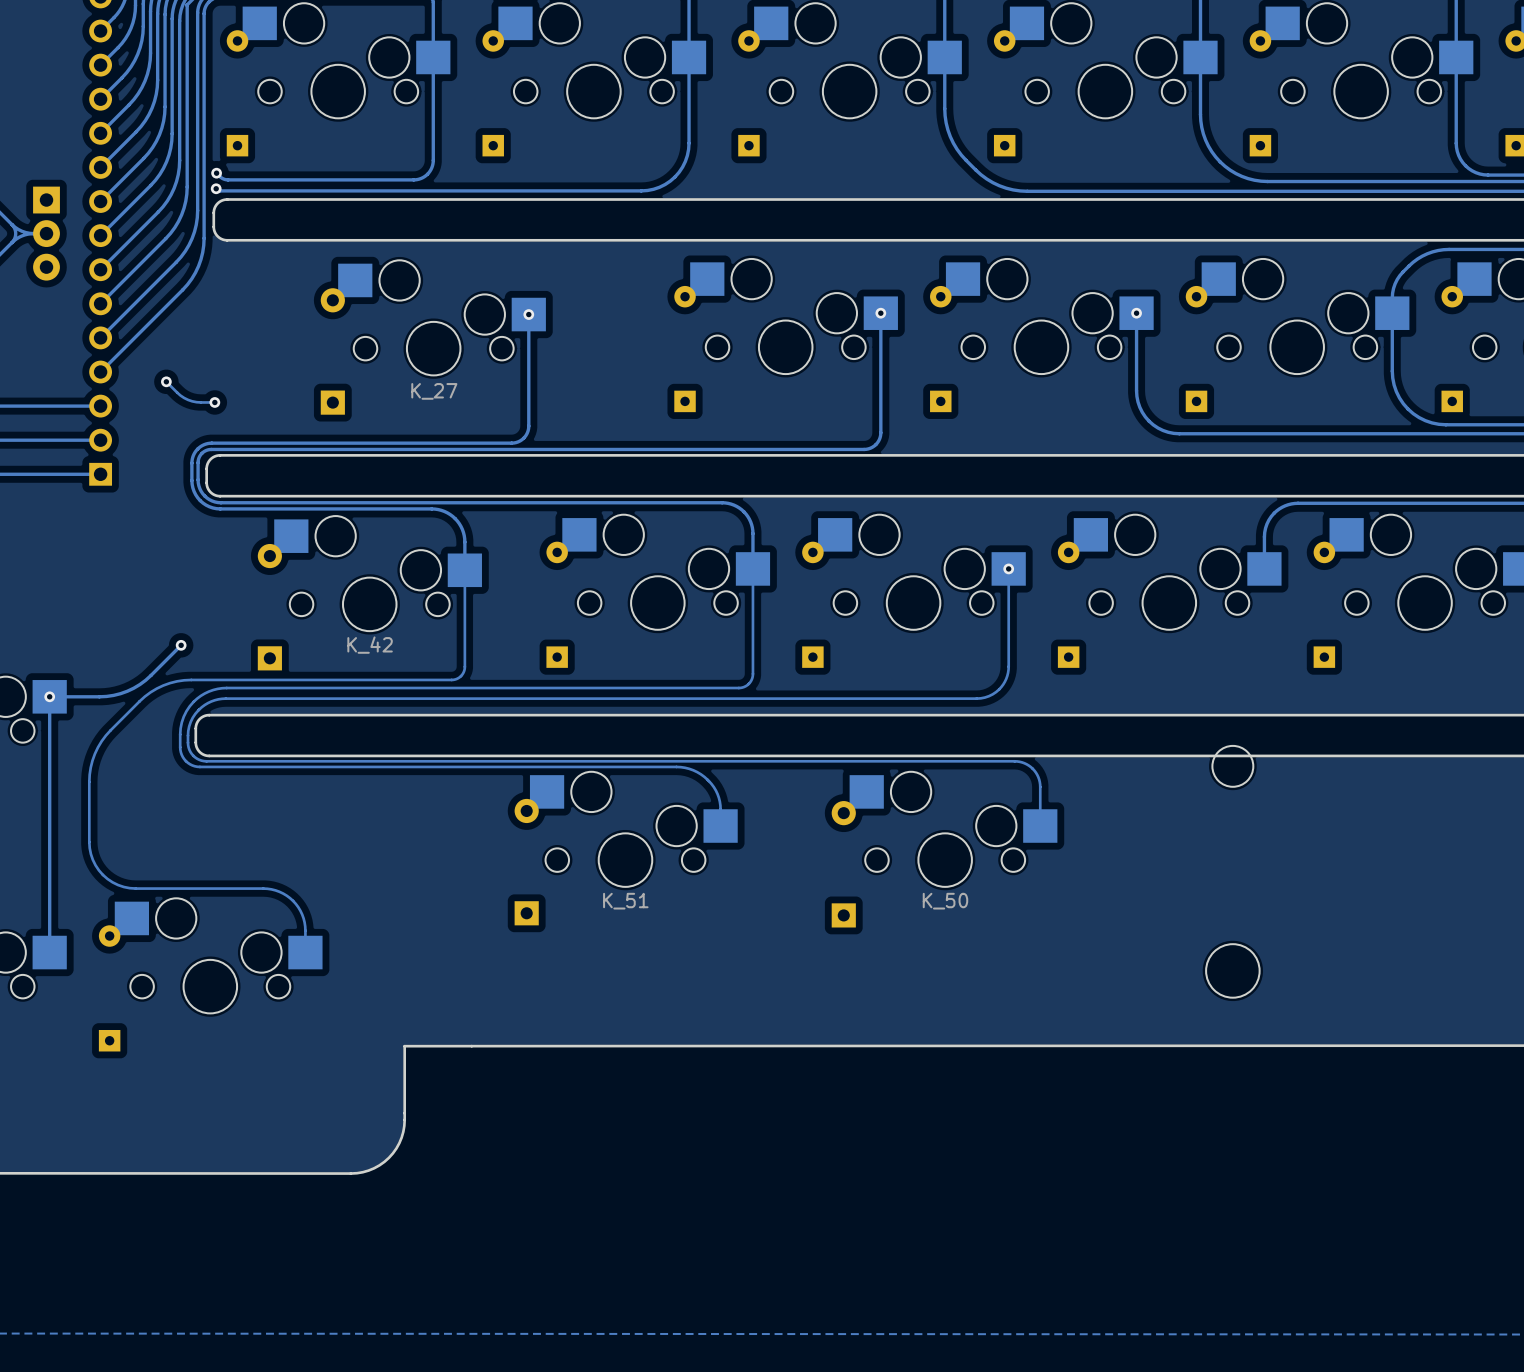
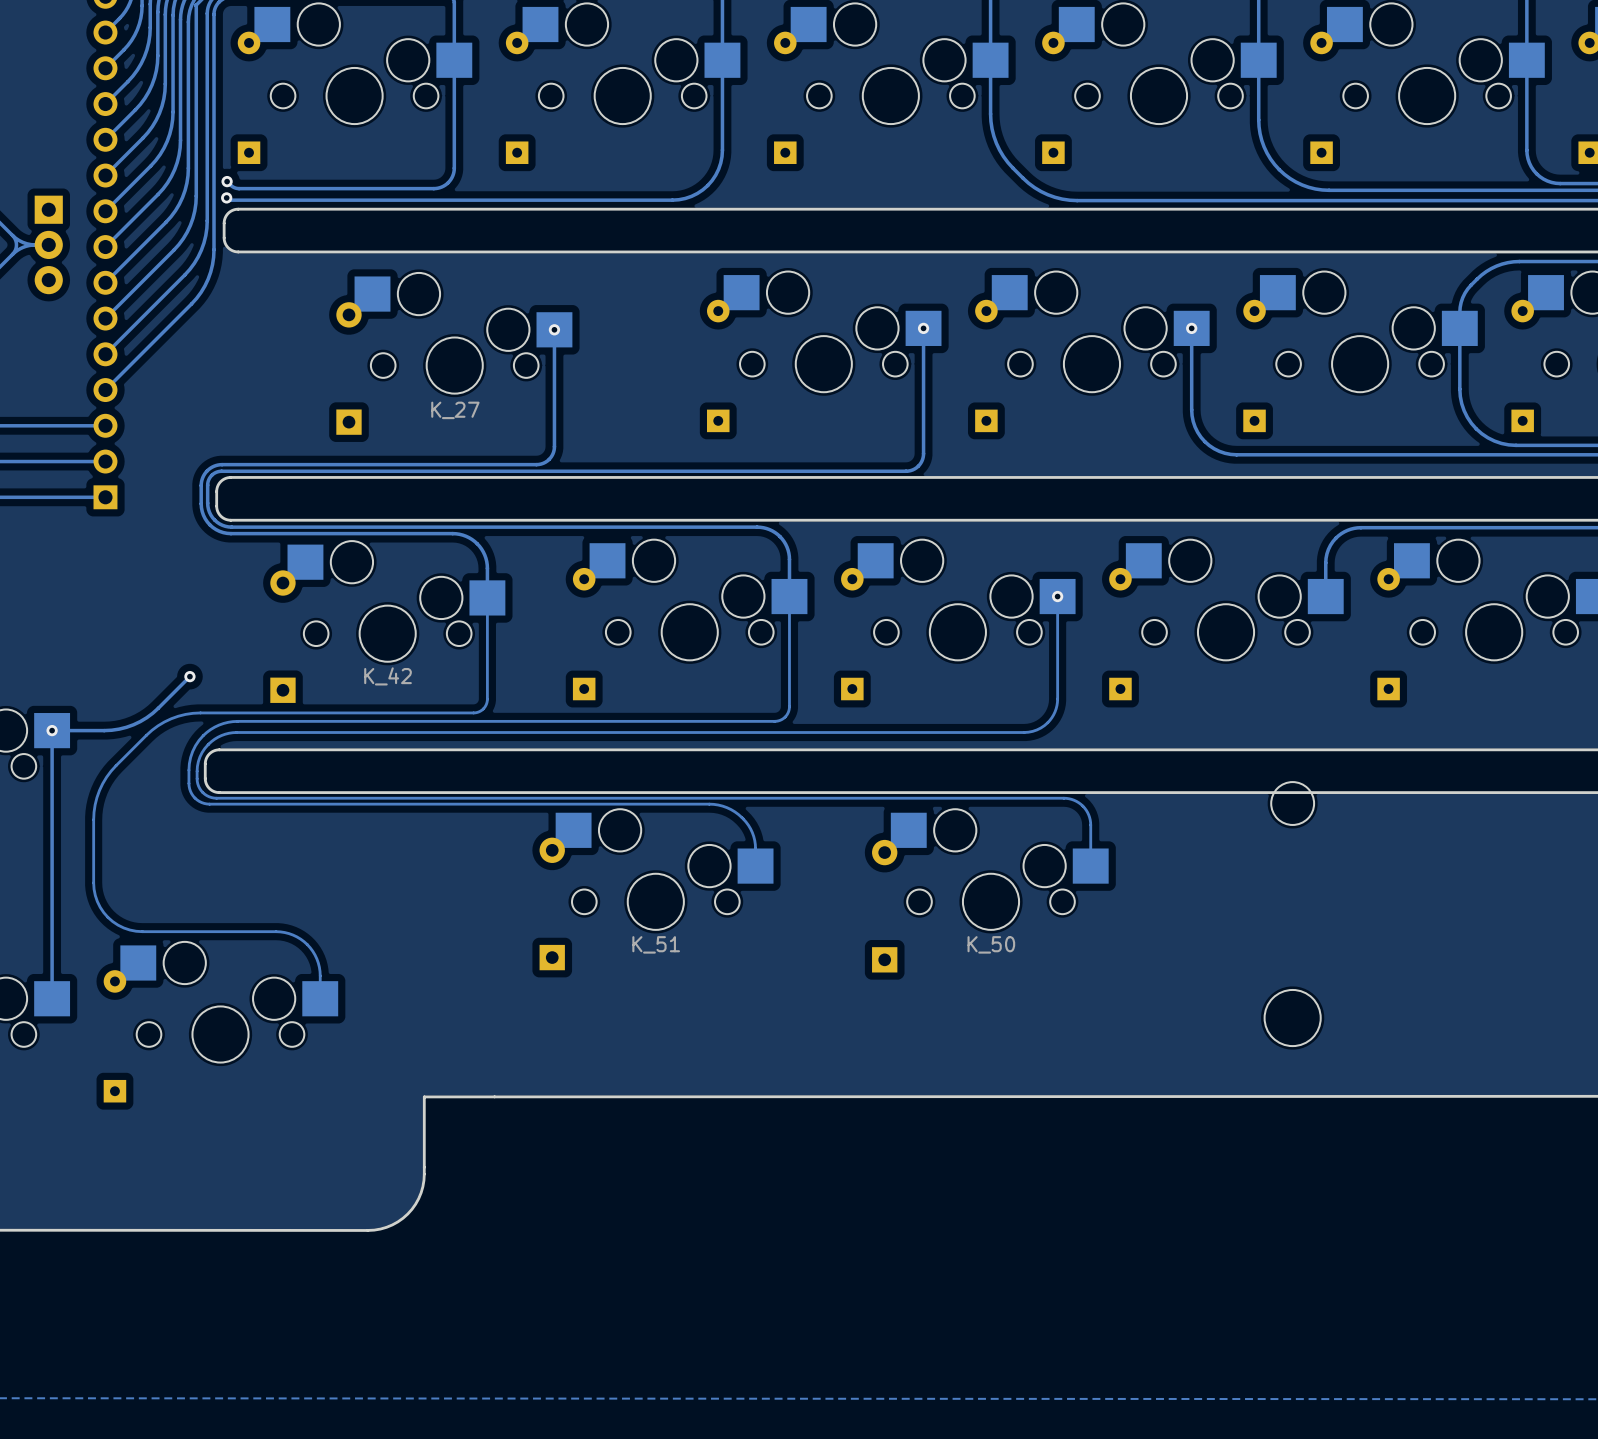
track: (166, 381) (188, 399) (214, 402) -> none
via: (166, 381) -> none
via: (214, 402) -> none

